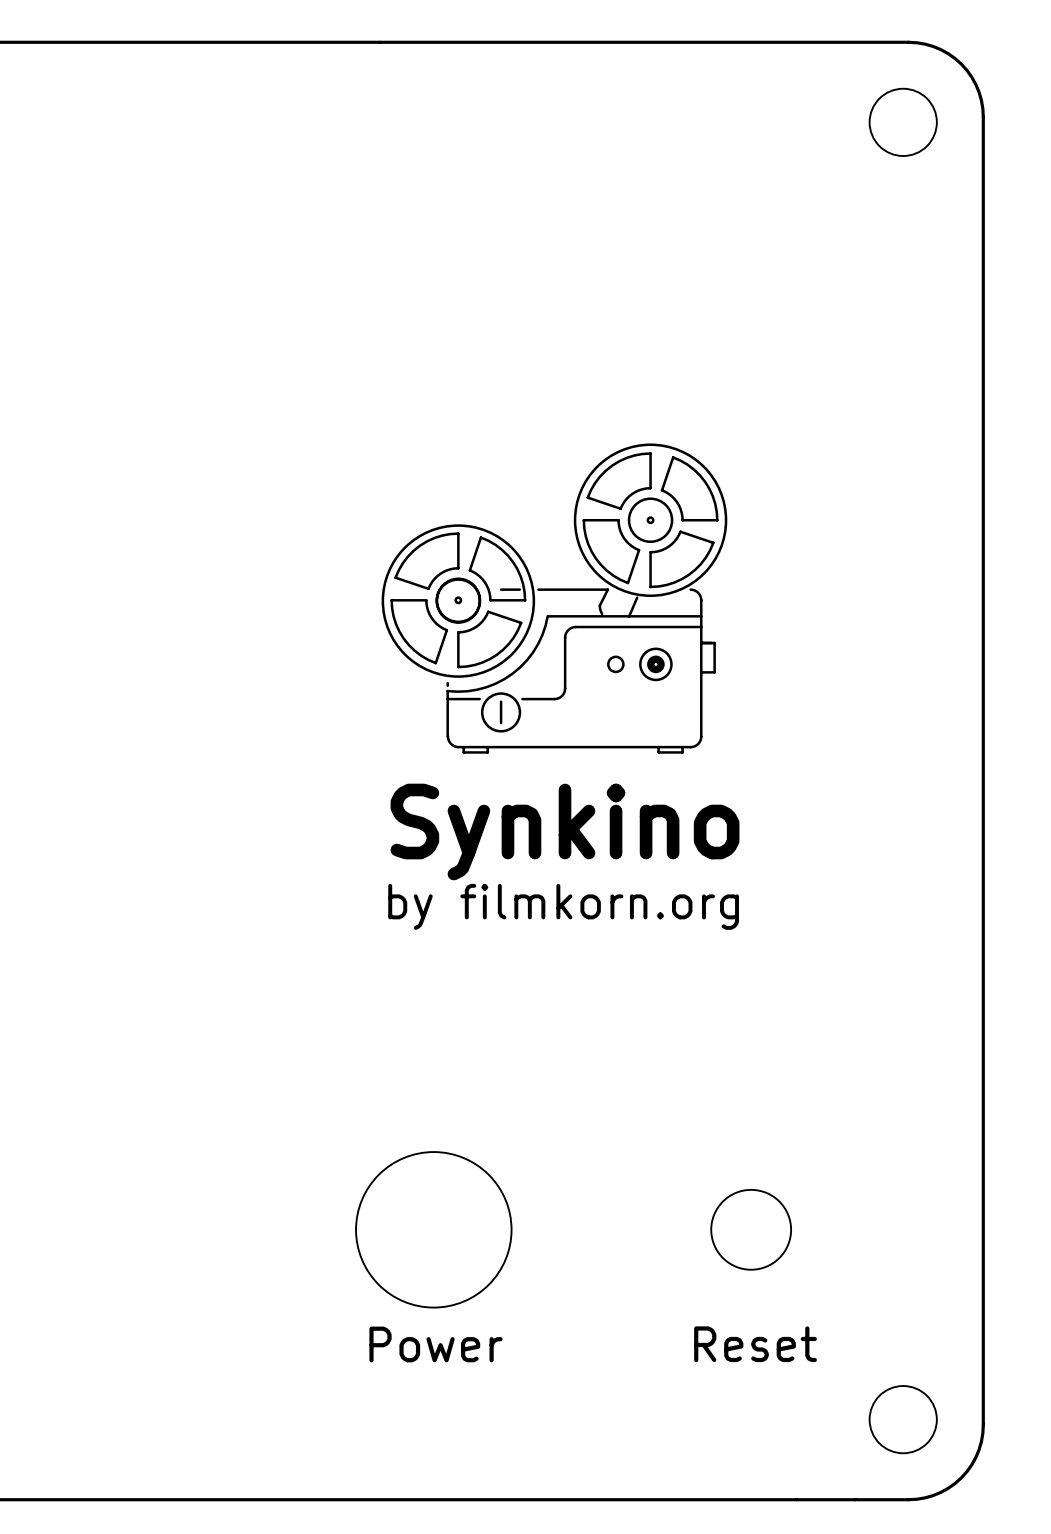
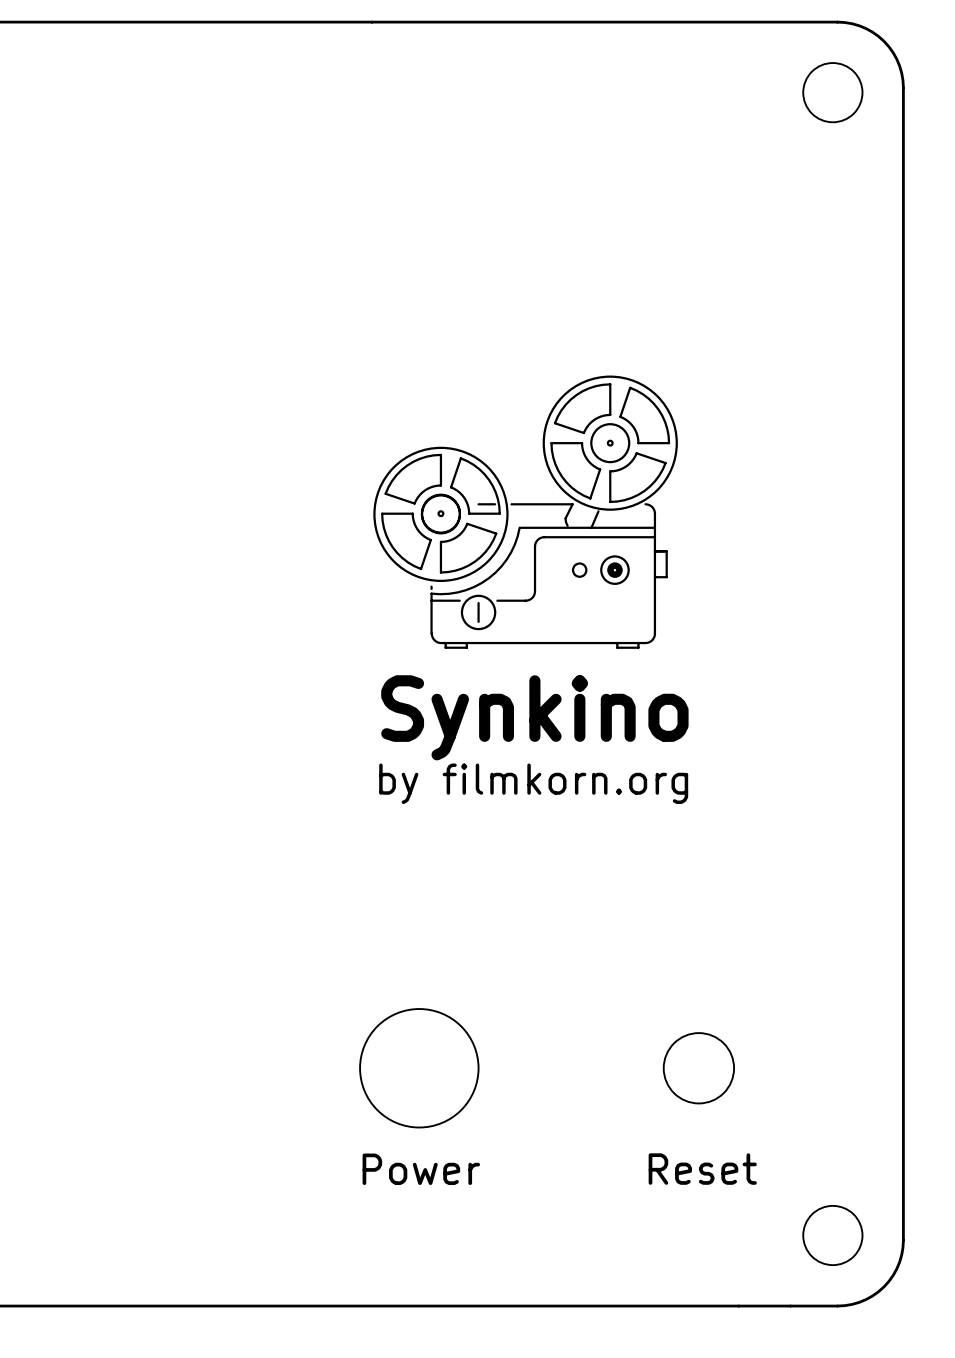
round board edge size: [355, 1151, 513, 1309] -> [359, 1008, 480, 1128]

